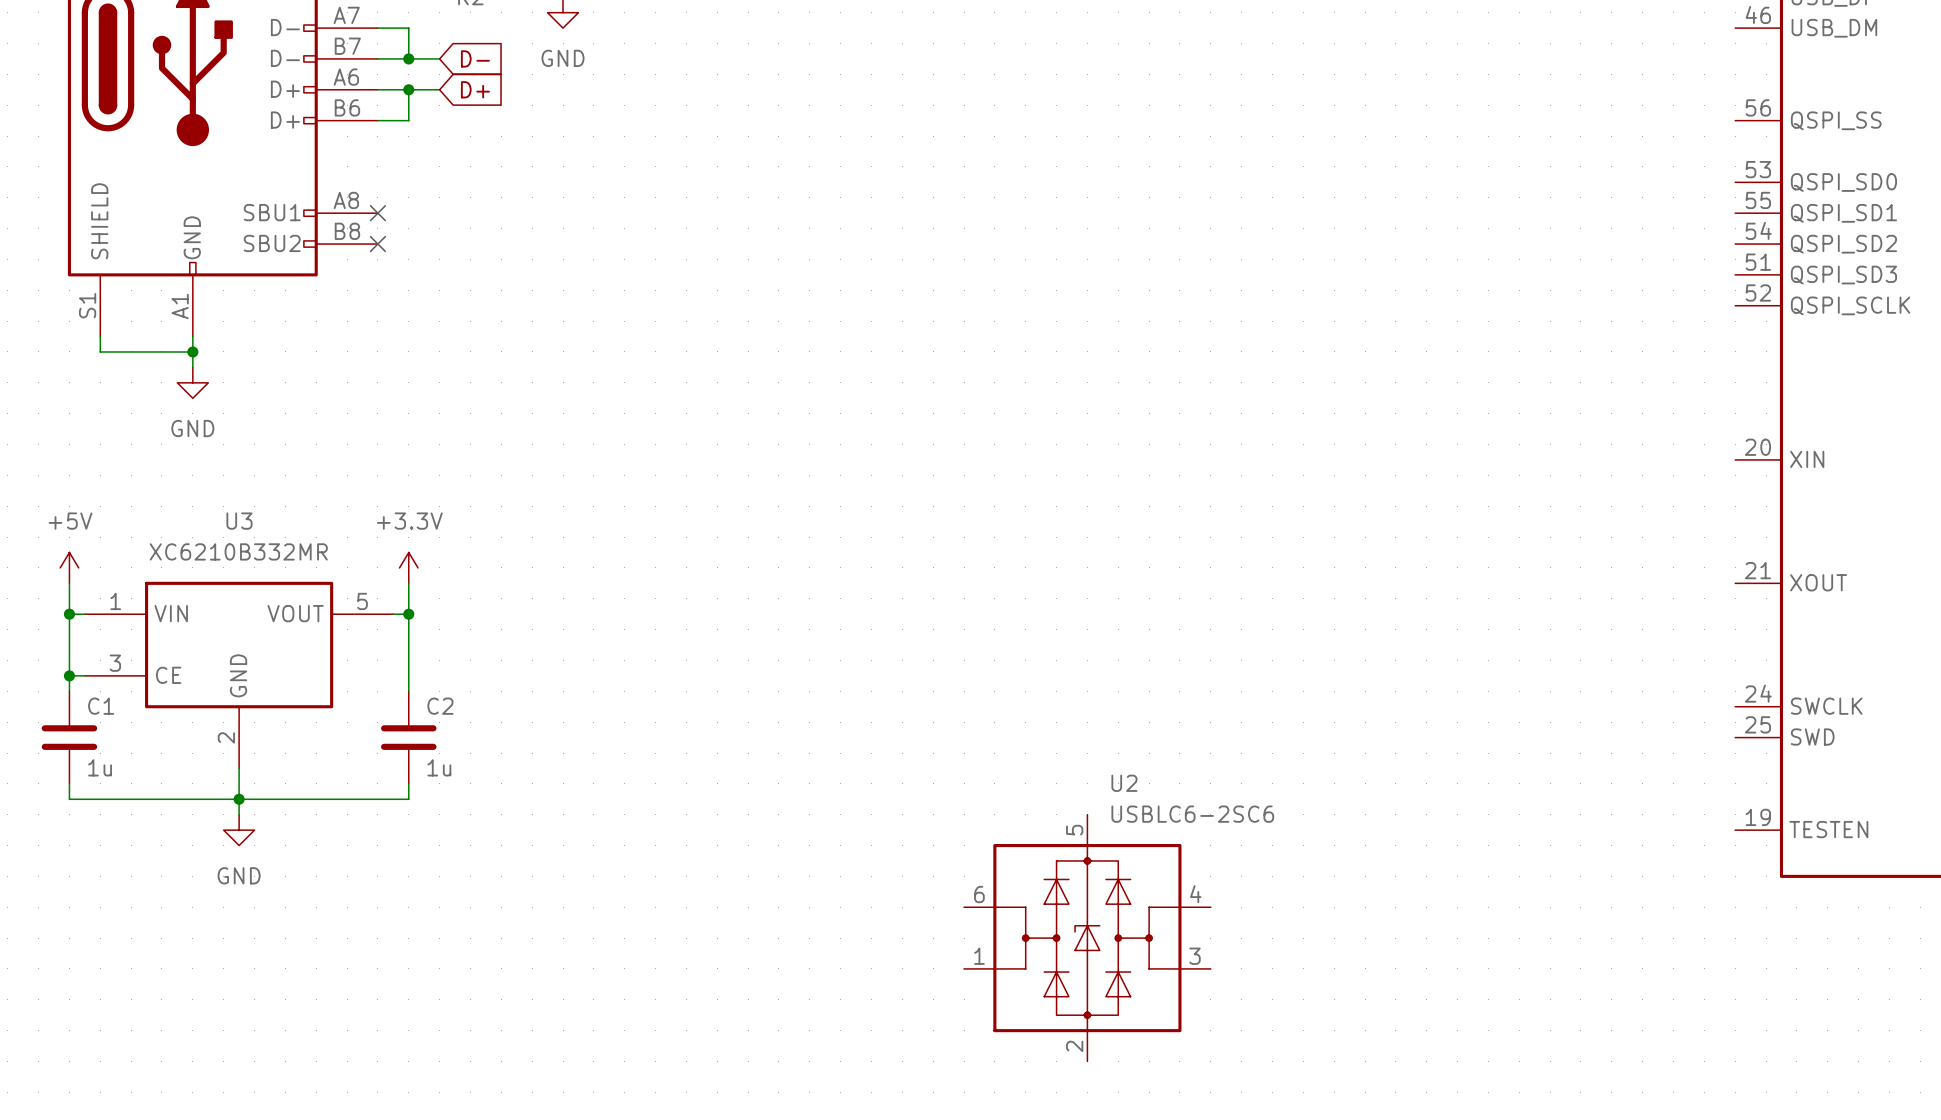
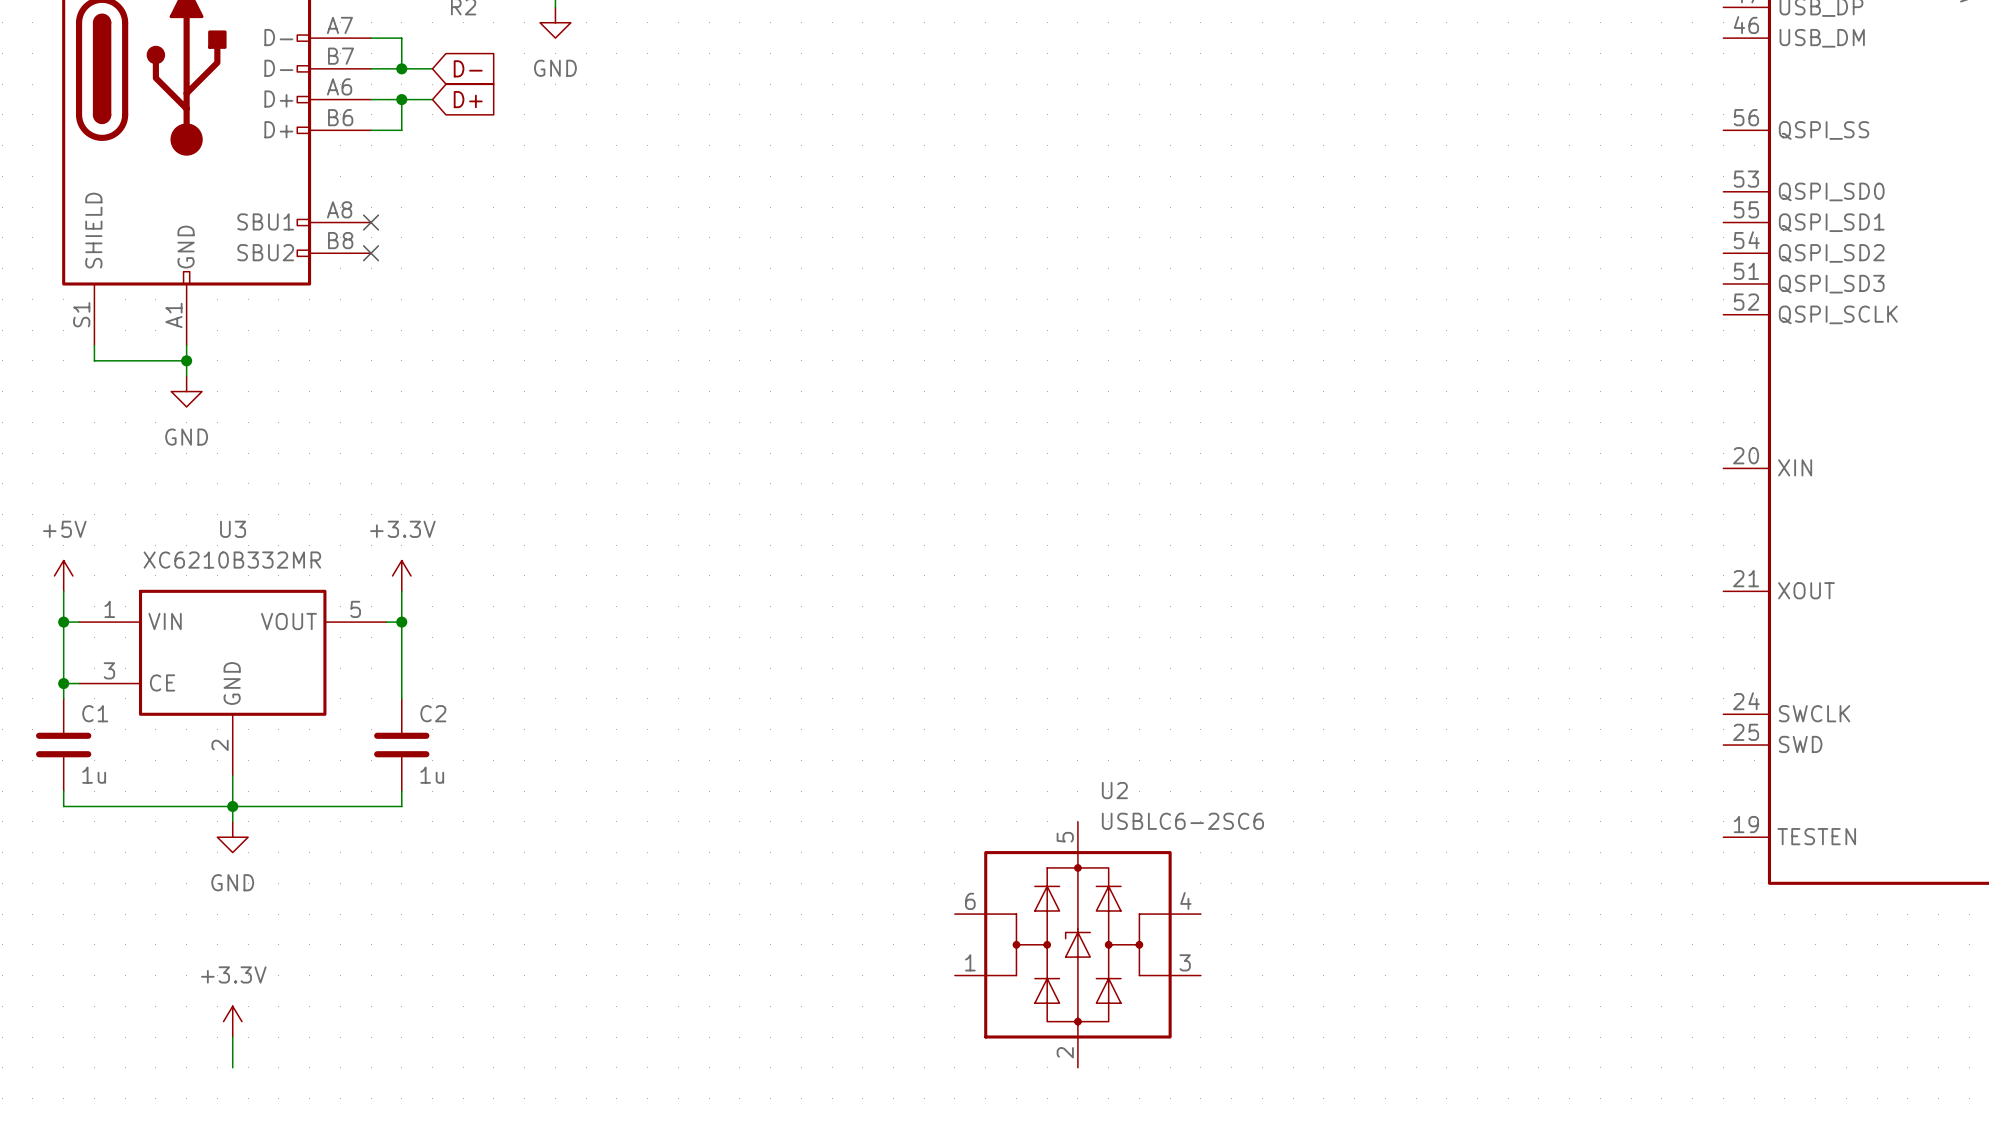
power symbol: none -> +3.3V (232, 1021)
wire: none -> (232, 1037) (232, 1067)

